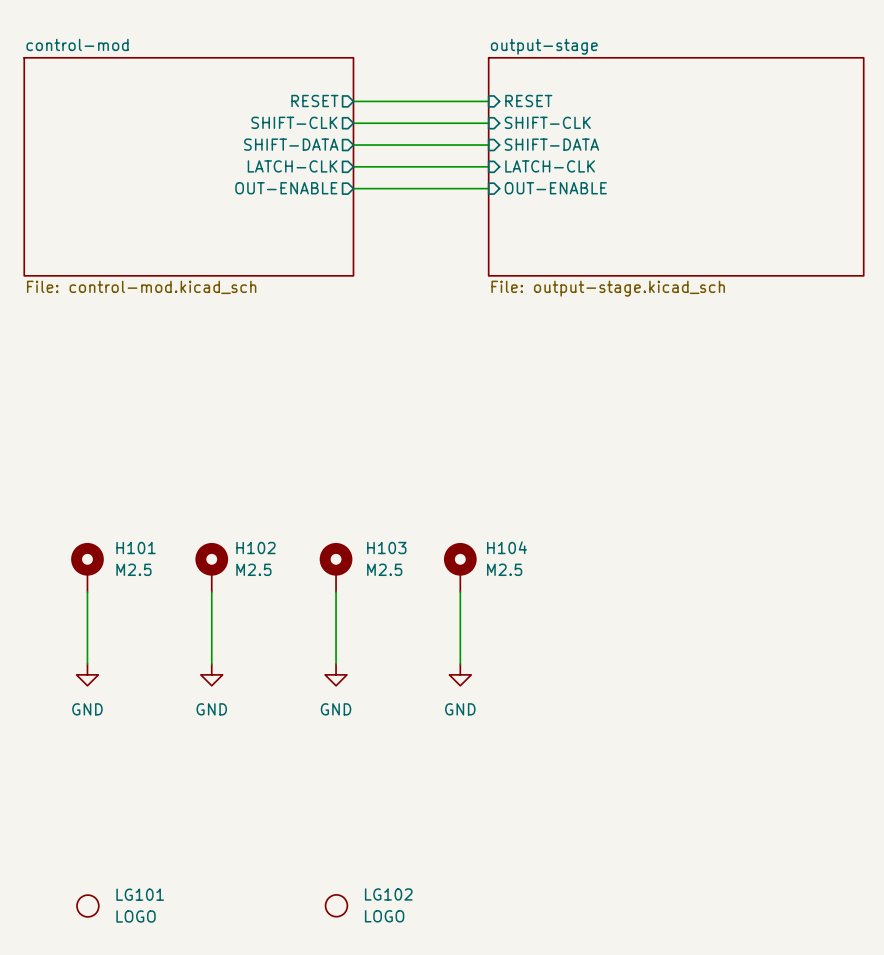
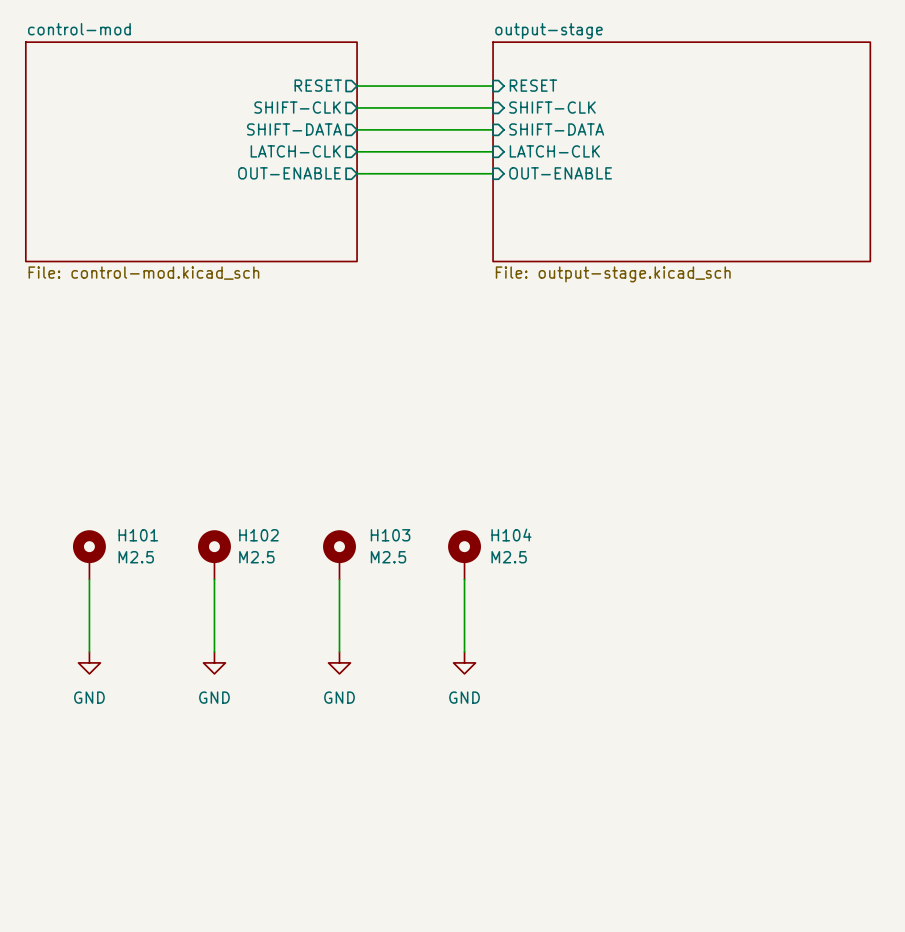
LG102: LOGO (336, 905) -> none
LG101: LOGO (87, 906) -> none

